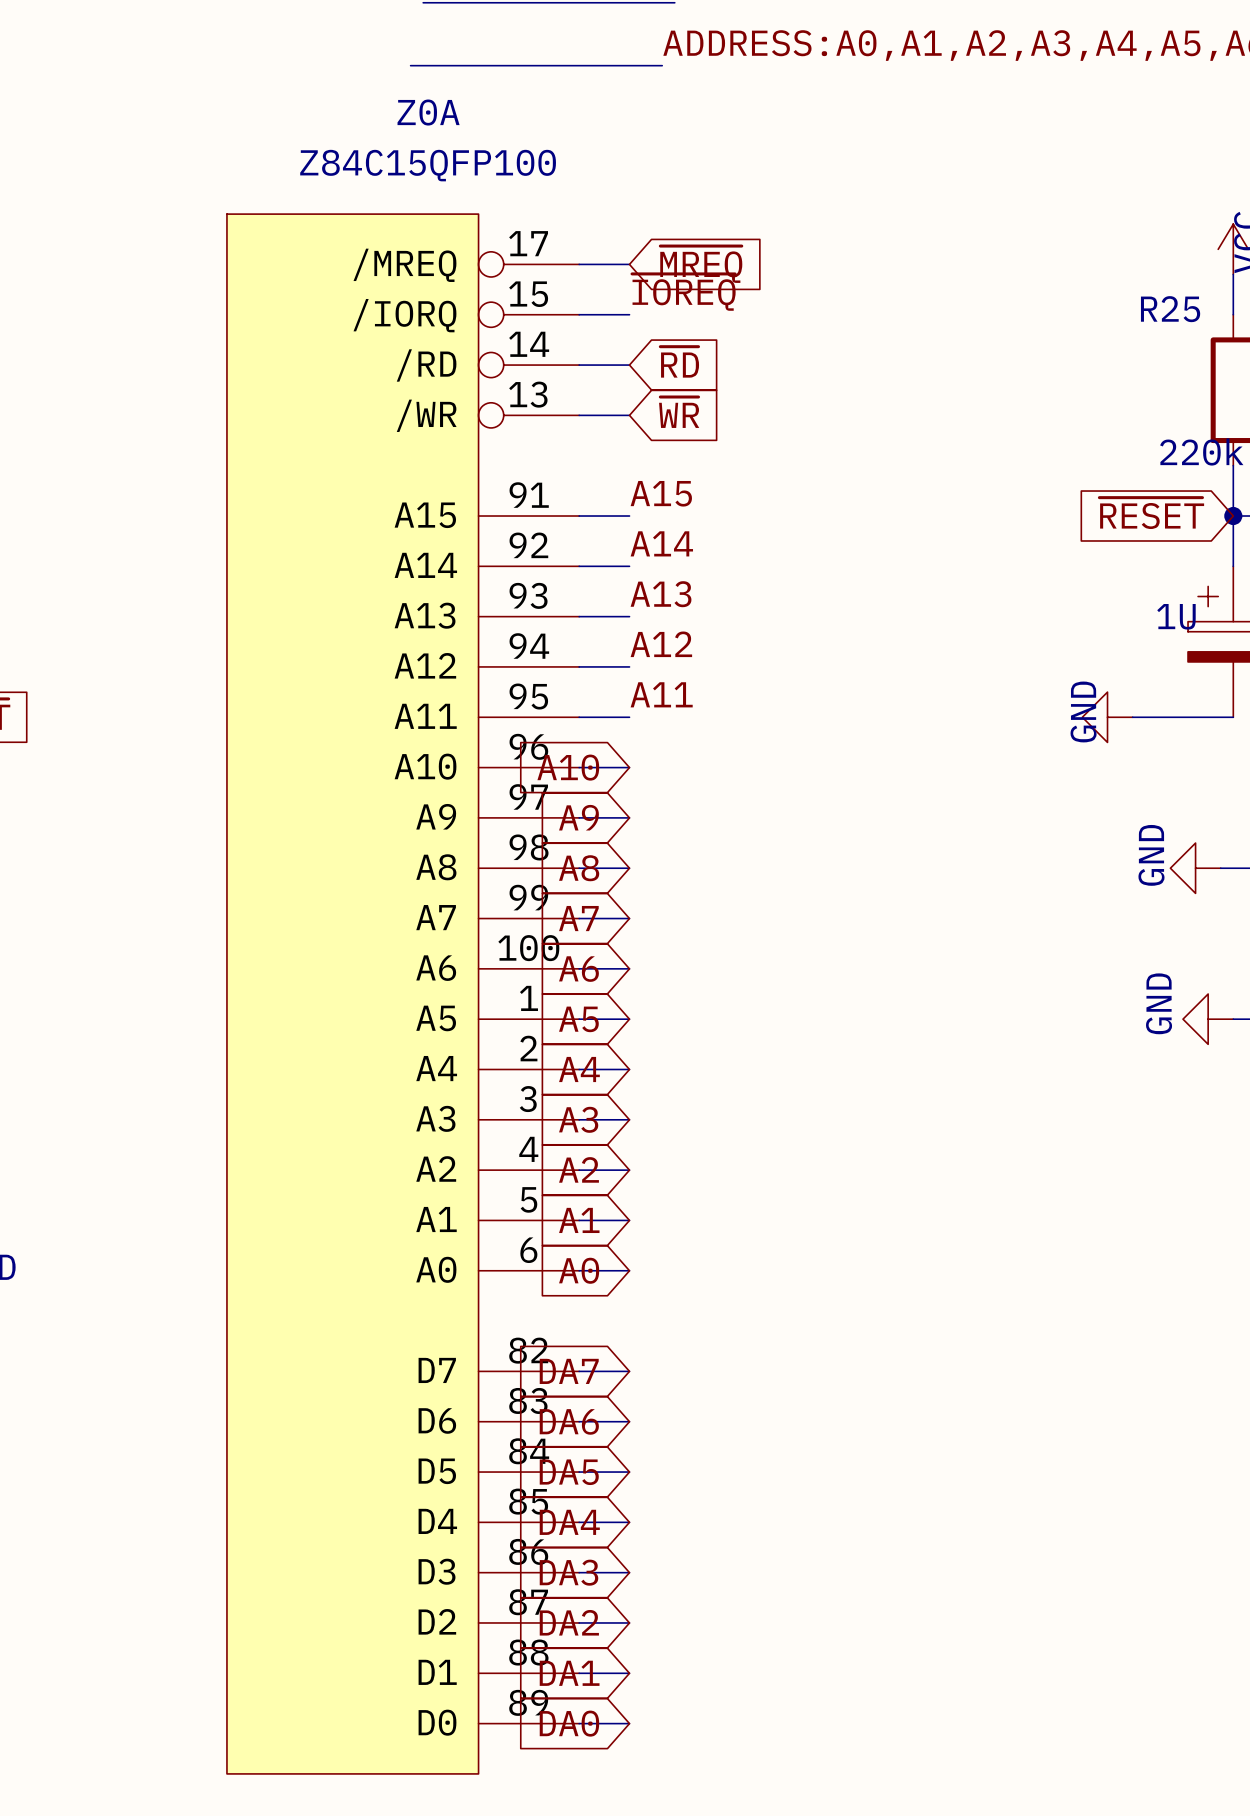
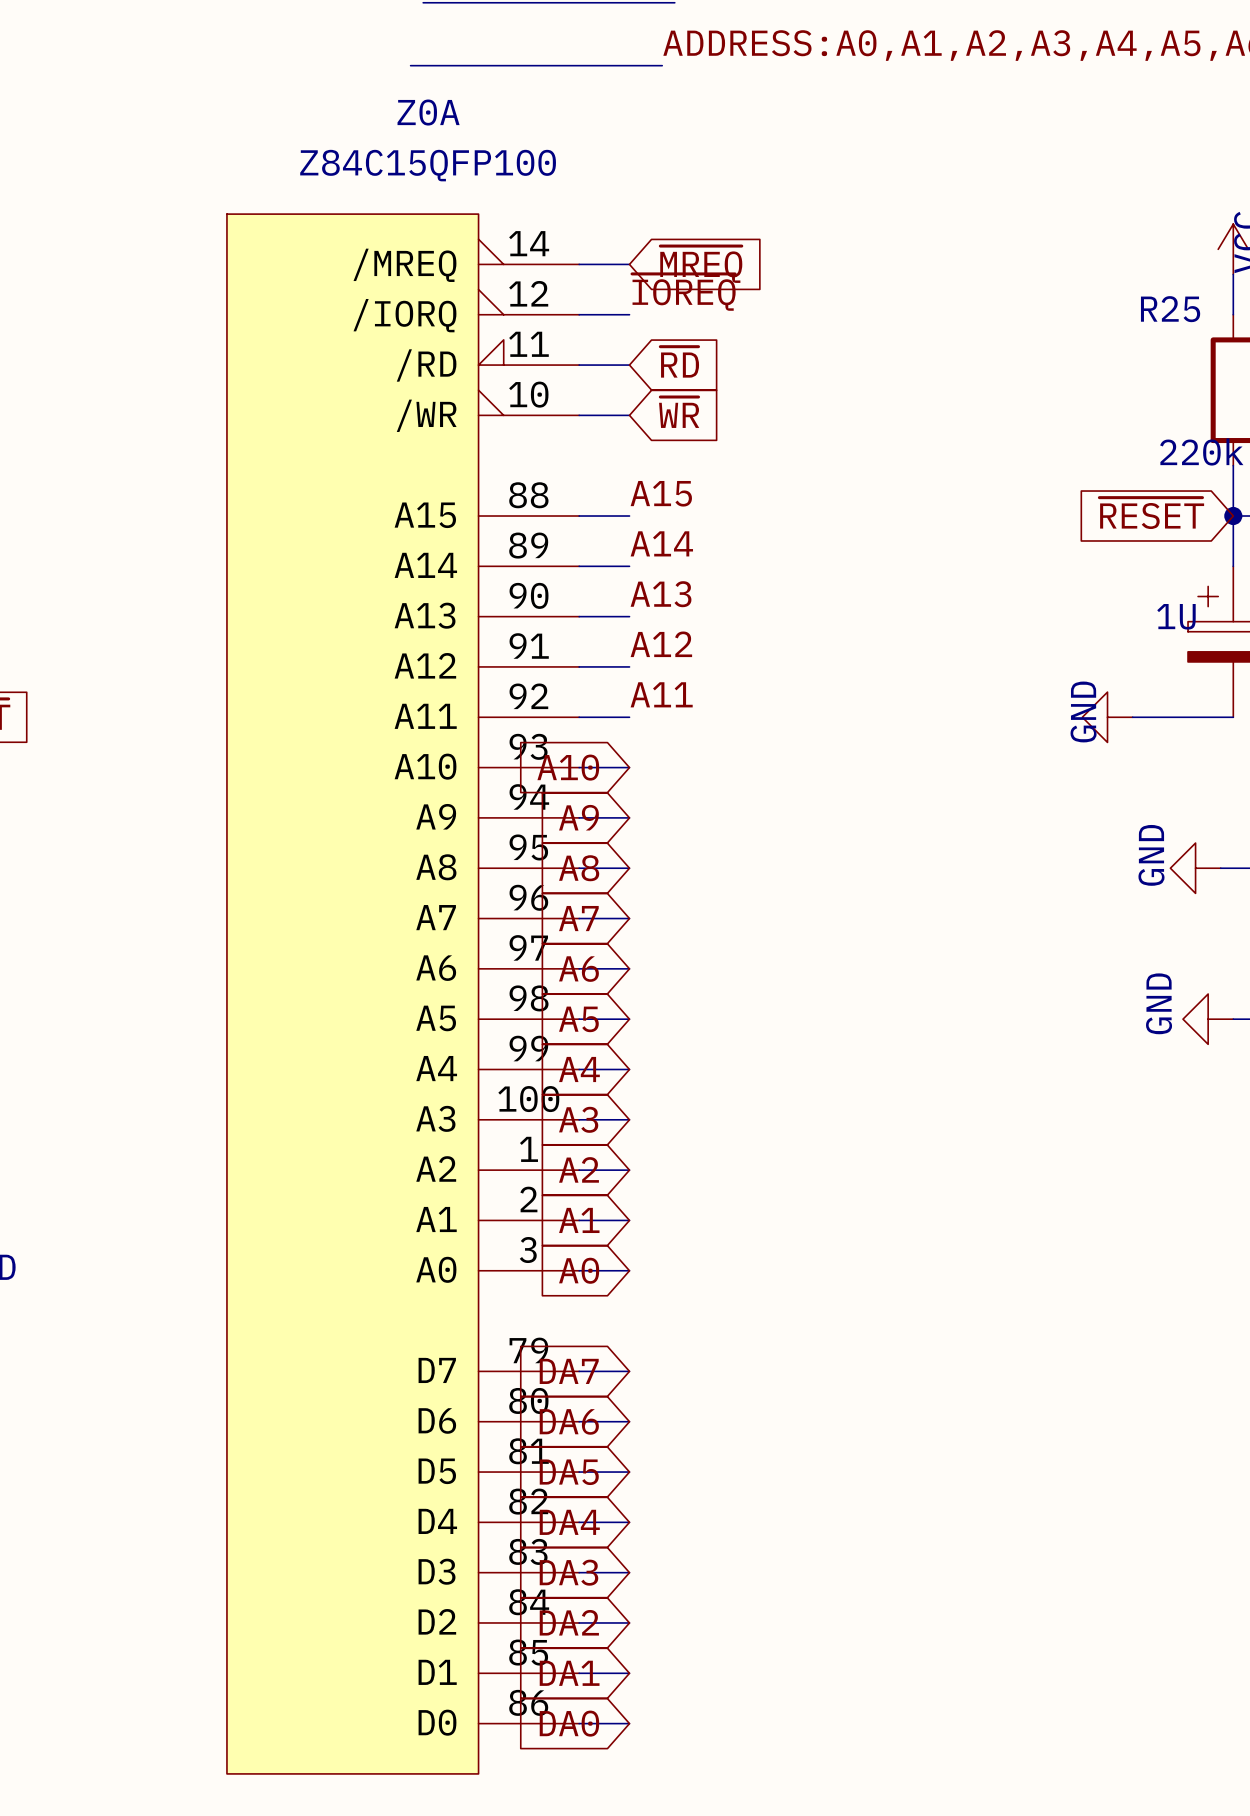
Z0A symbol: [226, 214, 580, 1774] -> [226, 214, 580, 1774]

